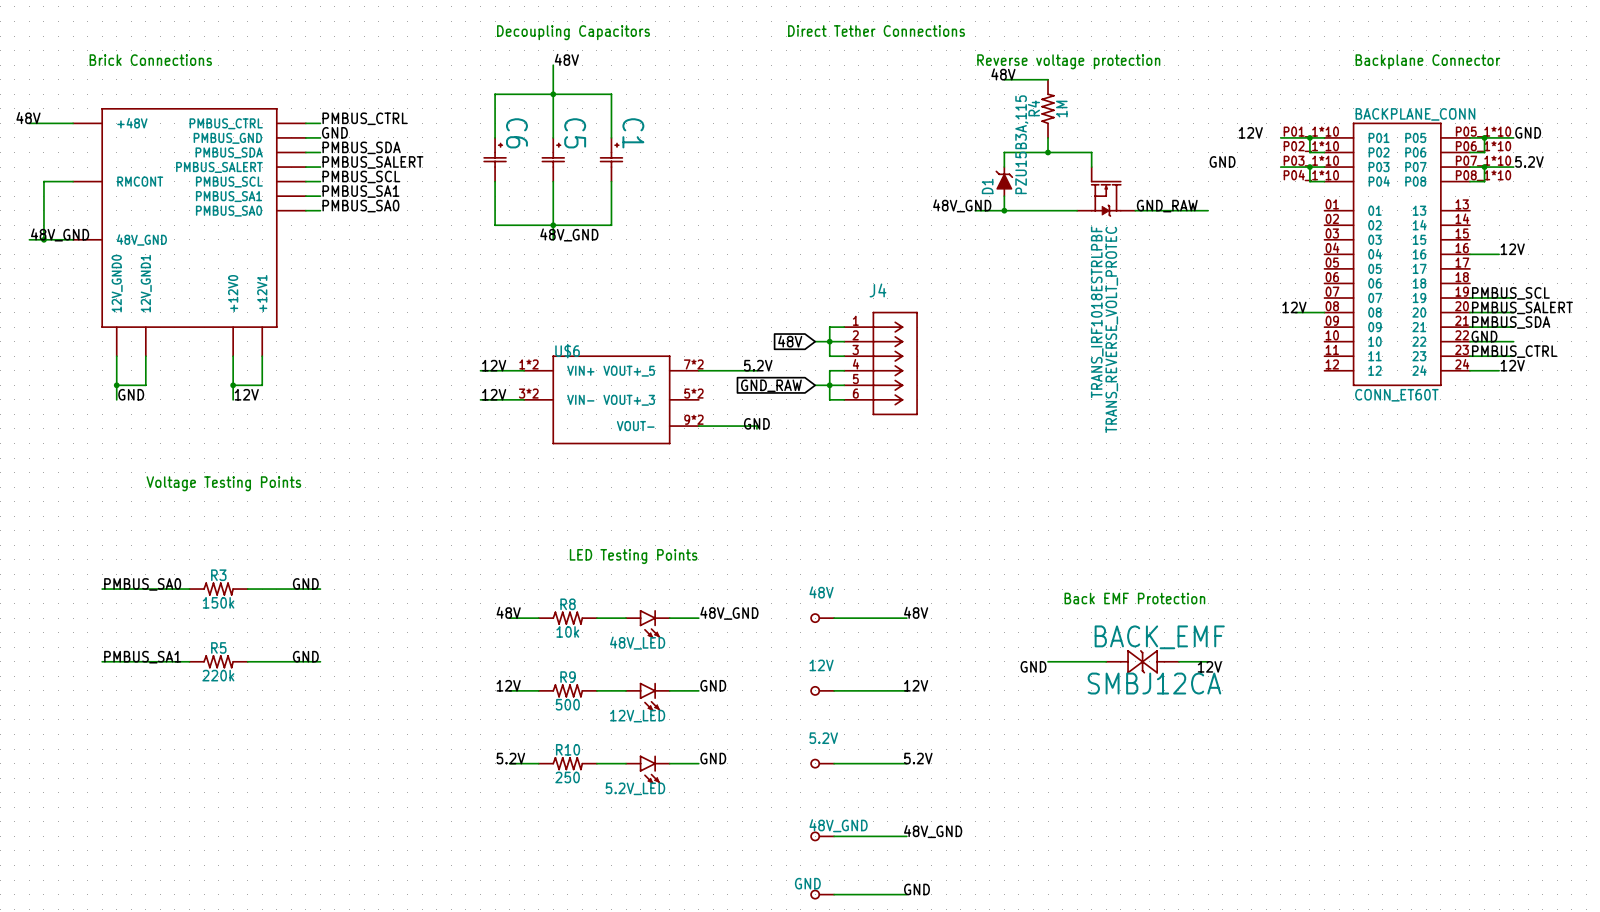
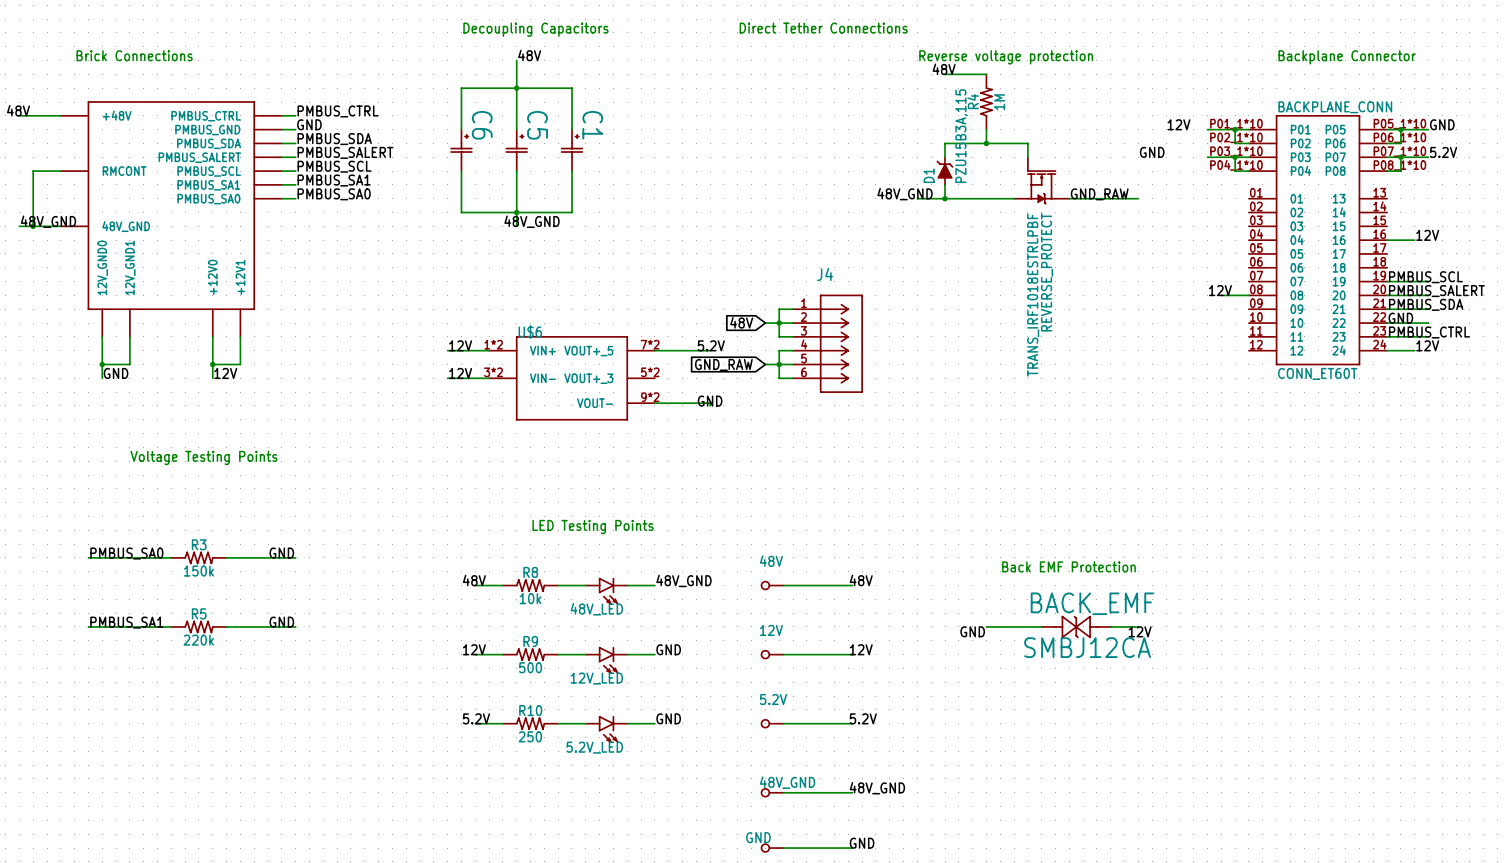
TRANS_REVERSE_VOLT_PROTEC name: TRANS_REVERSE_VOLT_PROTEC (1111, 329) -> REVERSE_PROTECT (1047, 272)

